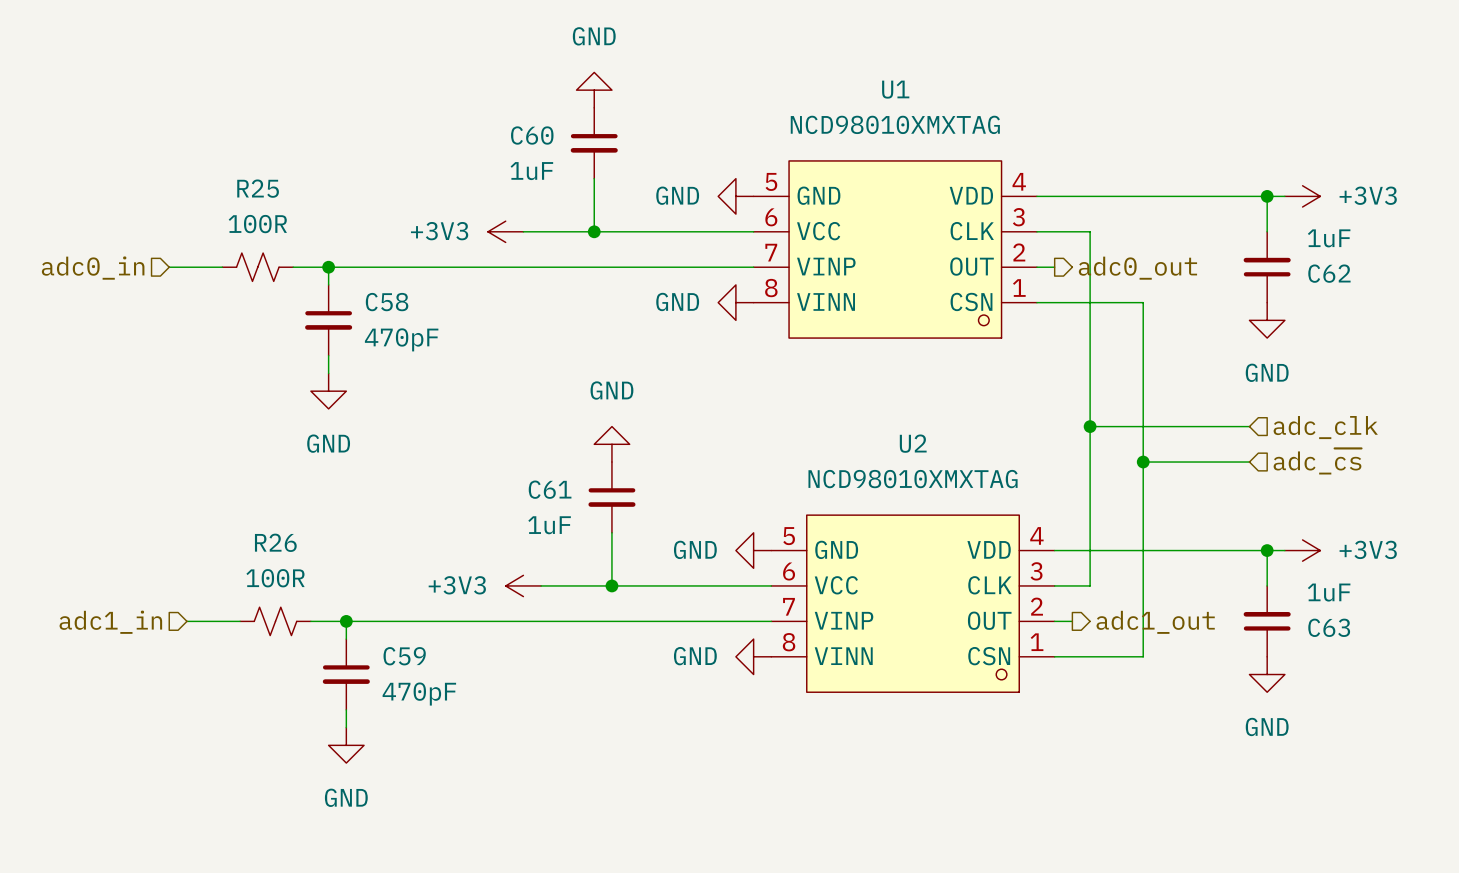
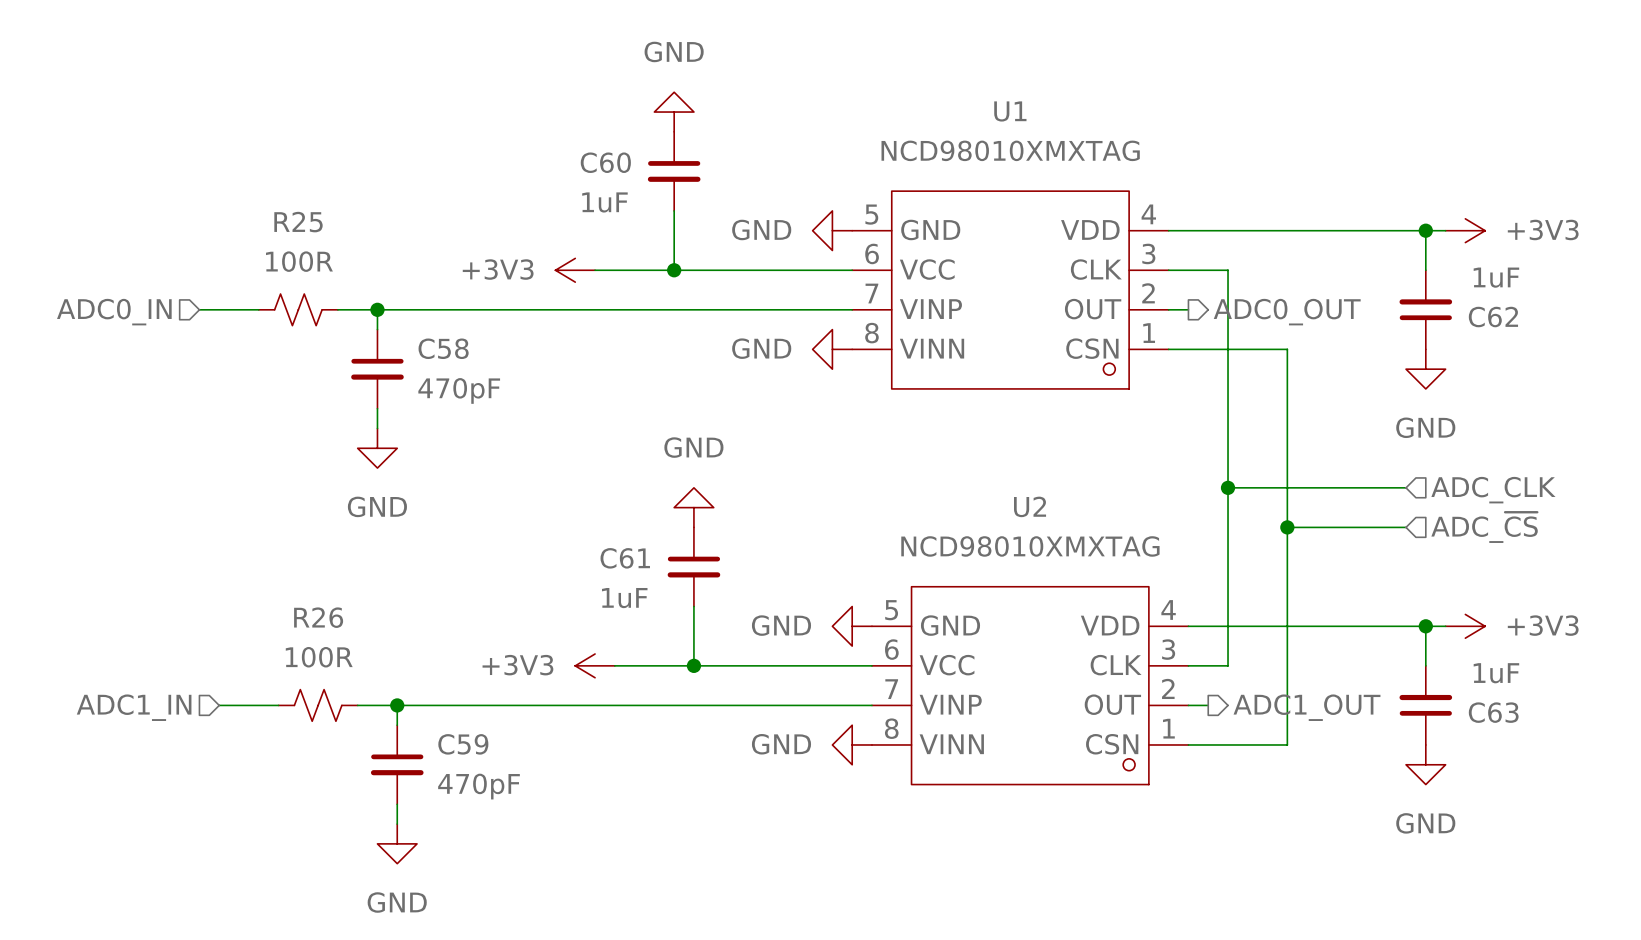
hierarchical label: adc0_in (93, 268) -> ADC0_IN (114, 312)
hierarchical label: adc0_out (1137, 268) -> ADC0_OUT (1287, 312)
hierarchical label: adc_clk (1325, 427) -> ADC_CLK (1493, 490)
hierarchical label: adc_~{cs} (1317, 461) -> ADC_~{CS} (1484, 527)
hierarchical label: adc1_in (110, 622) -> ADC1_IN (134, 707)
hierarchical label: adc1_out (1155, 622) -> ADC1_OUT (1307, 707)

